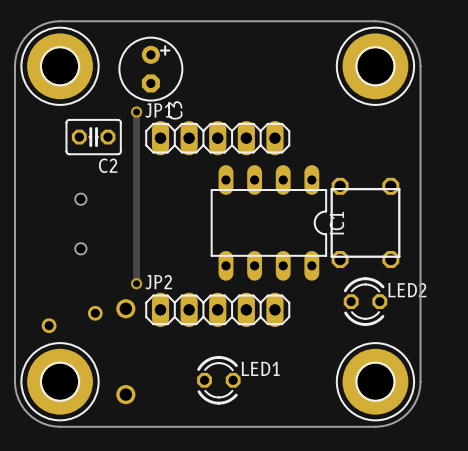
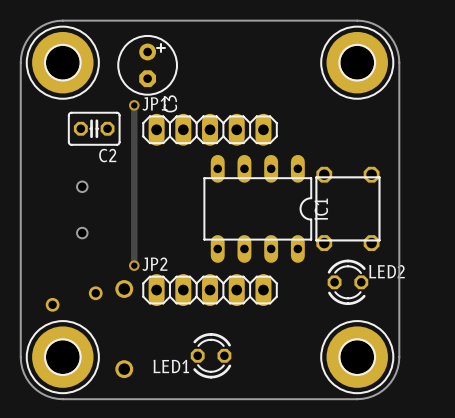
LED1 rotation: 0° (218, 380) -> 180° (211, 355)

